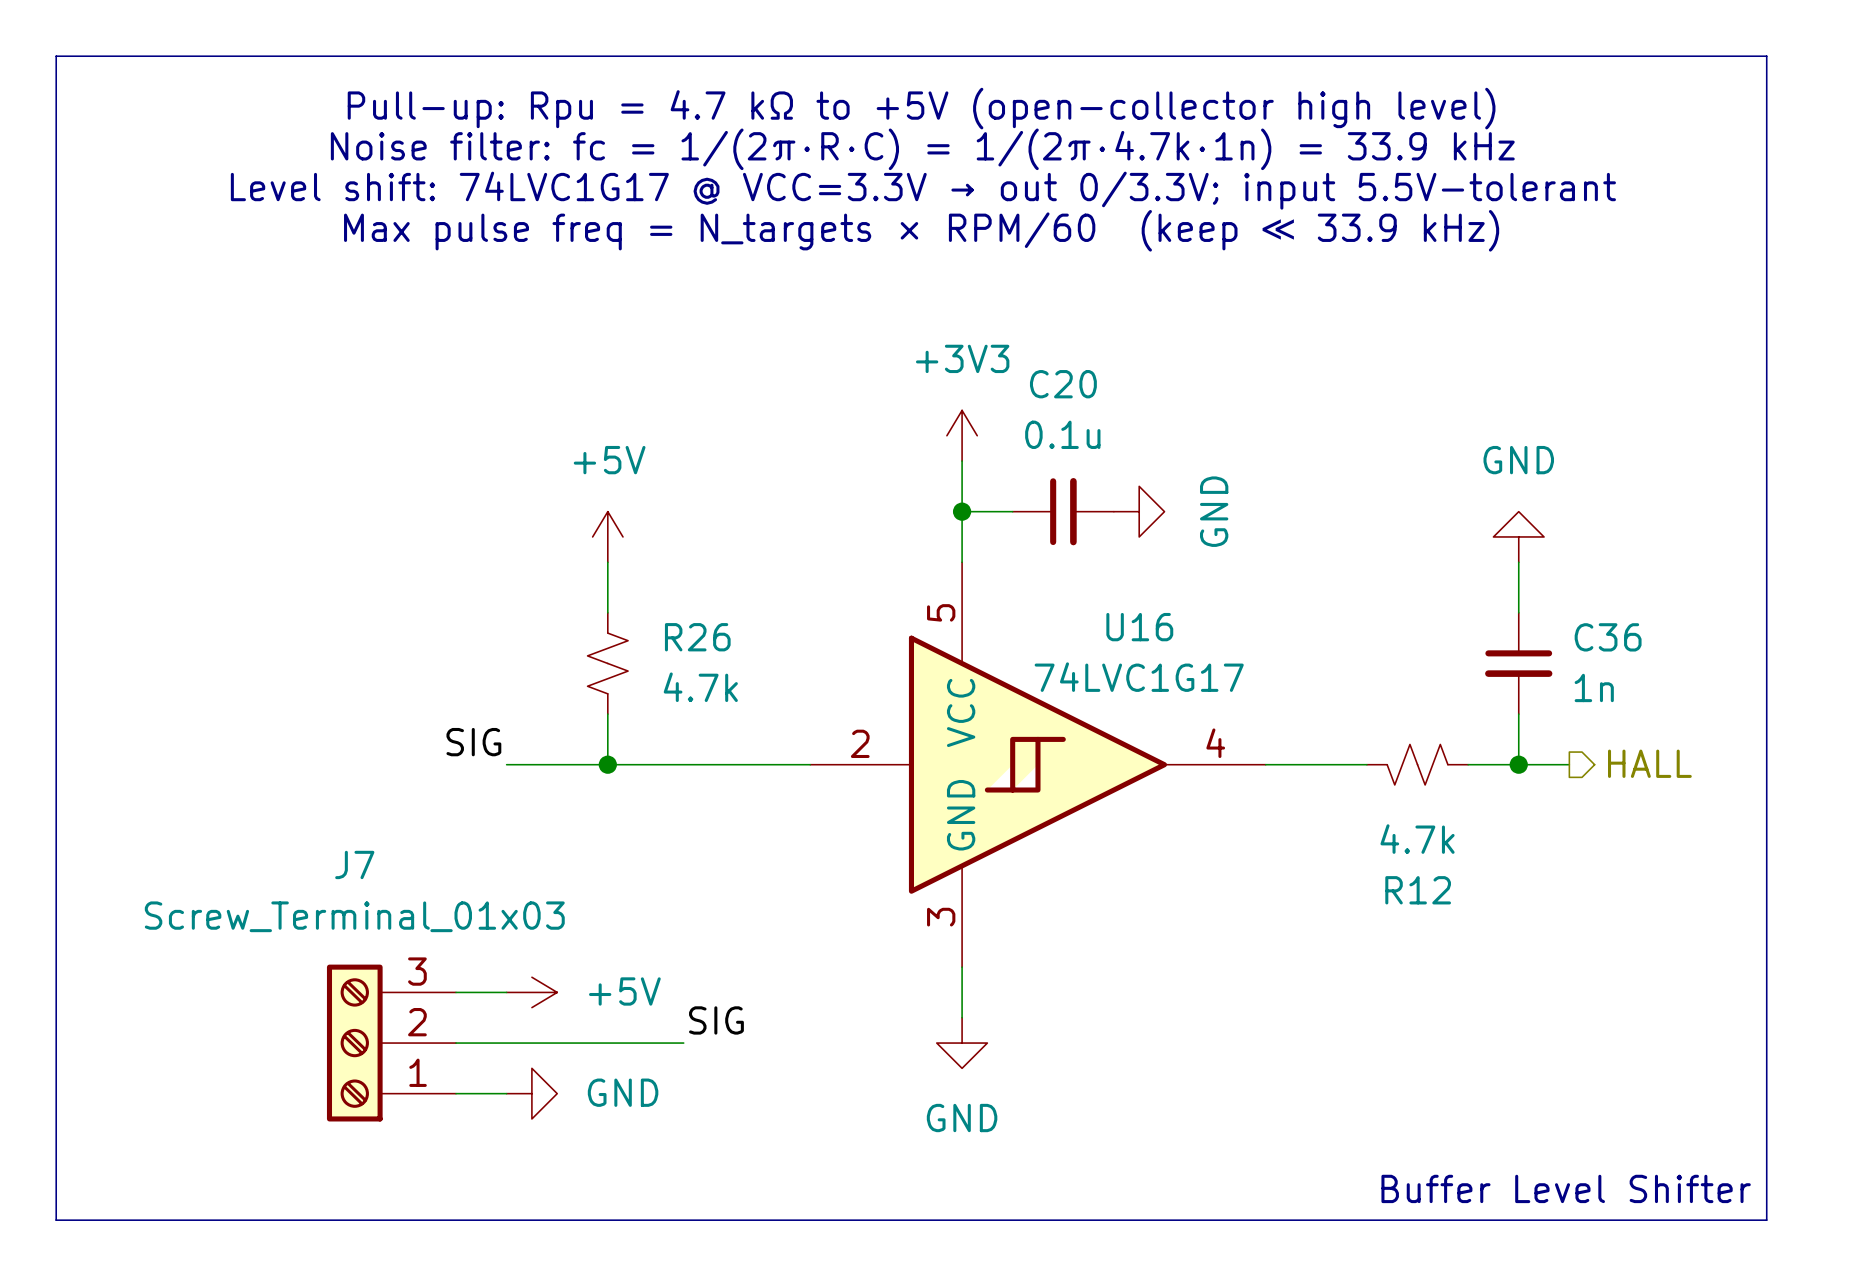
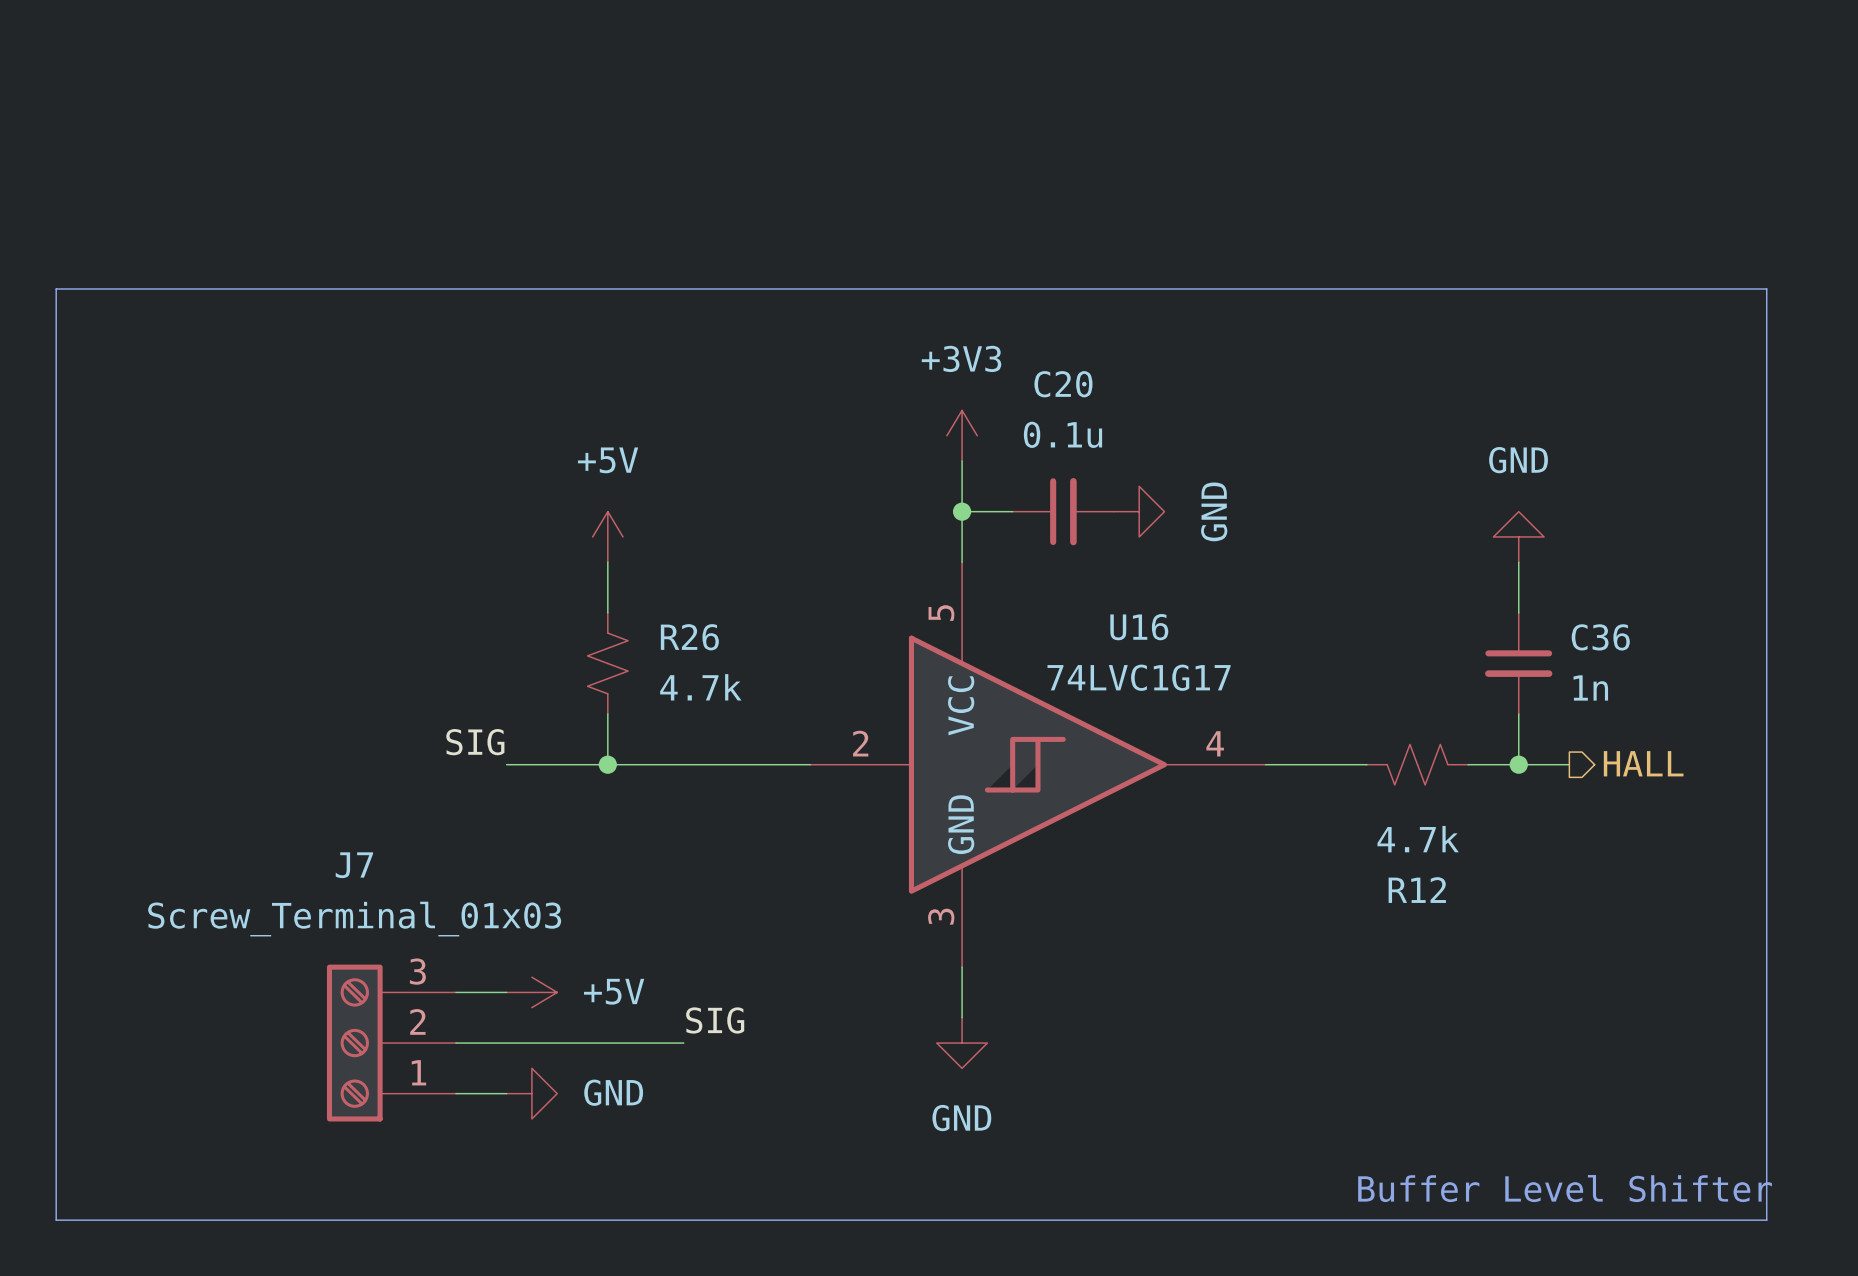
text: Pull-up: Rpu = 4.7 kΩ to +5V (open-collector high level) (921, 108) -> none
text: Noise filter: fc = 1/(2π·R·C) = 1/(2π·4.7k·1n) = 33.9 kHz (922, 149) -> none
text: Level shift: 74LVC1G17 @ VCC=3.3V → out 0/3.3V; input 5.5V-tolerant (923, 190) -> none
text: Max pulse freq = N_targets × RPM/60 (keep ≪ 33.9 kHz) (921, 230) -> none
line: (56, 288) (56, 56) (1766, 56) (1766, 288) -> (56, 288) (1766, 288)

